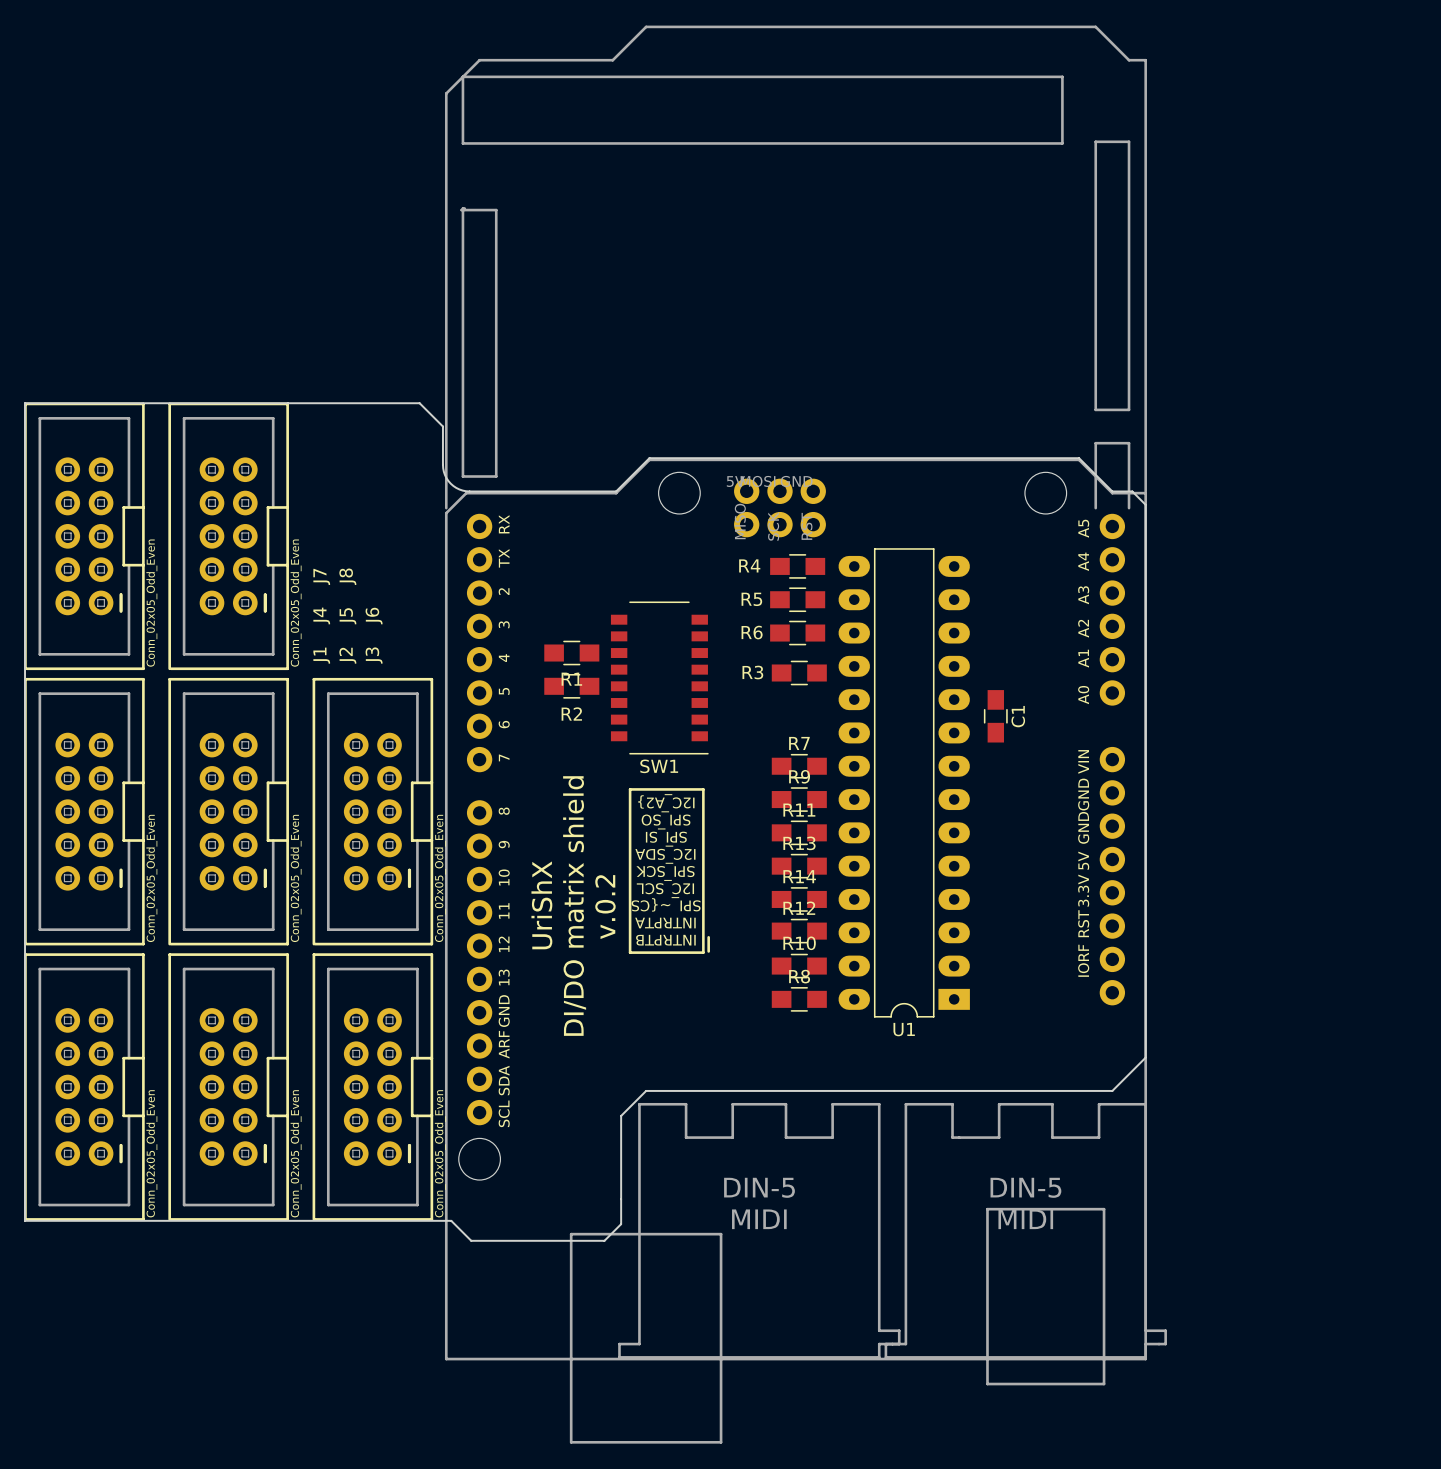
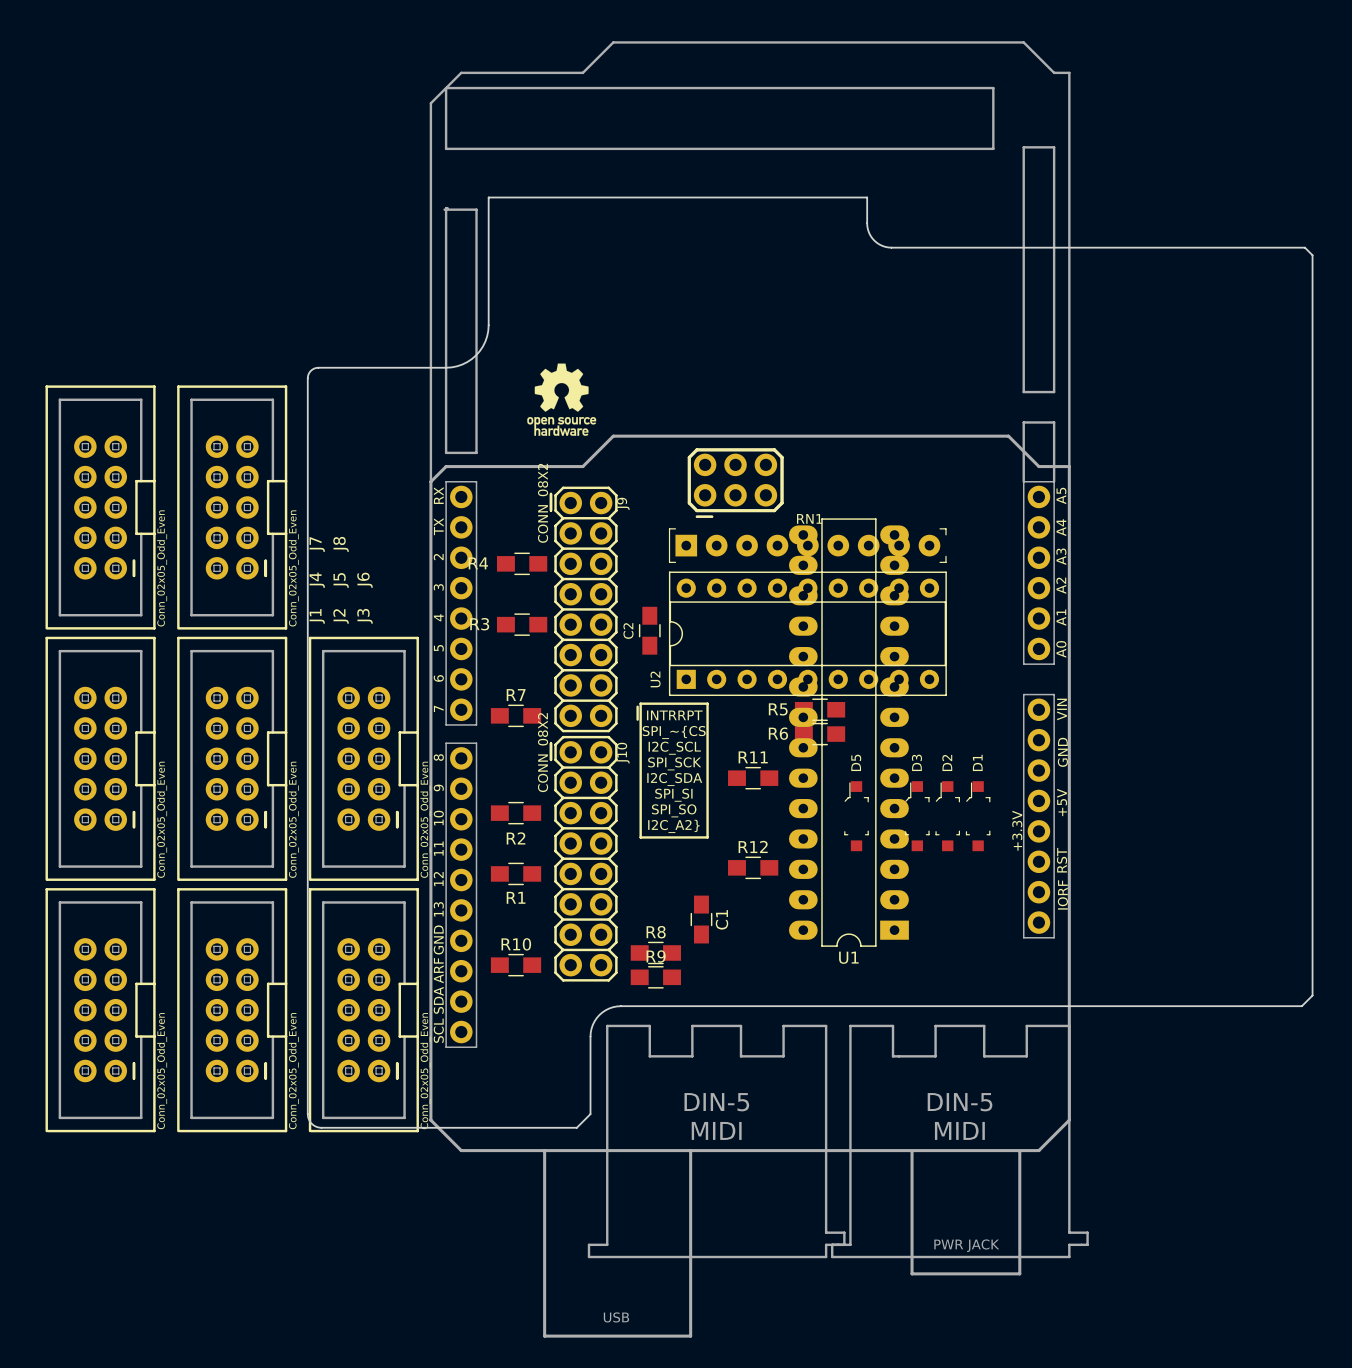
drawing: none -> [527, 363, 597, 436]
board edge: none -> (446, 367) (457, 366) (472, 358) (479, 351) (487, 336) (488, 197) (867, 197) (869, 232) (876, 242) (888, 247) (1304, 247) (1312, 255) (1312, 995) (1301, 1006) (620, 1006) (609, 1008) (599, 1015) (592, 1024) (590, 1036)
part footprint: [444, 458, 1148, 1444] -> [429, 434, 1071, 1338]
R4 position: (797, 566) -> (522, 563)
RN1: none -> (807, 545)
R5 position: (797, 599) -> (820, 709)
R6 position: (797, 633) -> (820, 734)
J9: none -> CONN_08X2 (583, 609)
R1 position: (571, 653) -> (516, 873)
C2: none -> (649, 630)
R3 position: (799, 672) -> (522, 624)
U2: none -> (807, 633)
SW1: (659, 677) -> none
R2 position: (571, 686) -> (516, 813)
C1 position: (995, 716) -> (701, 919)
line: none -> (640, 703) (707, 703) (707, 837) (640, 837) (640, 703)
text: none -> INTRRPT (674, 715)
R7 position: (799, 766) -> (516, 715)
line: (630, 789) (703, 789) (703, 952) (630, 952) (630, 789) -> none
R9 position: (799, 799) -> (655, 977)
text rotation: 0° (666, 801) -> 180° (673, 826)
text position: I2C_A2} (666, 801) -> I2C_A2} (673, 826)
text rotation: 0° (666, 818) -> 180° (674, 810)
text rotation: 0° (666, 835) -> 180° (673, 795)
text rotation: 0° (665, 852) -> 180° (674, 779)
R13: (799, 866) -> none
text rotation: 0° (665, 869) -> 180° (674, 763)
D5: none -> (856, 816)
D3: none -> (917, 816)
D2: none -> (947, 816)
D1: none -> (978, 816)
text rotation: 0° (665, 887) -> 180° (674, 748)
text position: I2C_SCL (665, 887) -> I2C_SCL (674, 748)
R14: (799, 899) -> none
text rotation: 0° (666, 904) -> 180° (674, 732)
text position: SPI_~{CS (666, 904) -> SPI_~{CS (674, 732)
text: UriShX (541, 905) -> none
text: DI/DO matrix shield (574, 906) -> none
text: v.0.2 (605, 907) -> none
J10: none -> CONN_08X2 (583, 858)
text: INTRPTA (665, 923) -> none
line: (708, 937) (708, 951) -> (637, 706) (637, 719)
text: INTRPTB (665, 940) -> none
R10 position: (799, 966) -> (516, 965)
R8 position: (799, 999) -> (655, 952)
board edge: (621, 1115) (646, 1090) (1112, 1090) (1145, 1057) (1145, 504) (1132, 491) (1112, 491) (1079, 458) (649, 458) (616, 491) (466, 491) (456, 487) (446, 478) (443, 468) (442, 426) (419, 403) (25, 403) (25, 1220) (451, 1220) (471, 1240) (604, 1240) (621, 1224) (621, 1200) -> (446, 367) (317, 367) (310, 370) (307, 377) (307, 1115) (311, 1123) (321, 1127) (576, 1127) (590, 1114)

